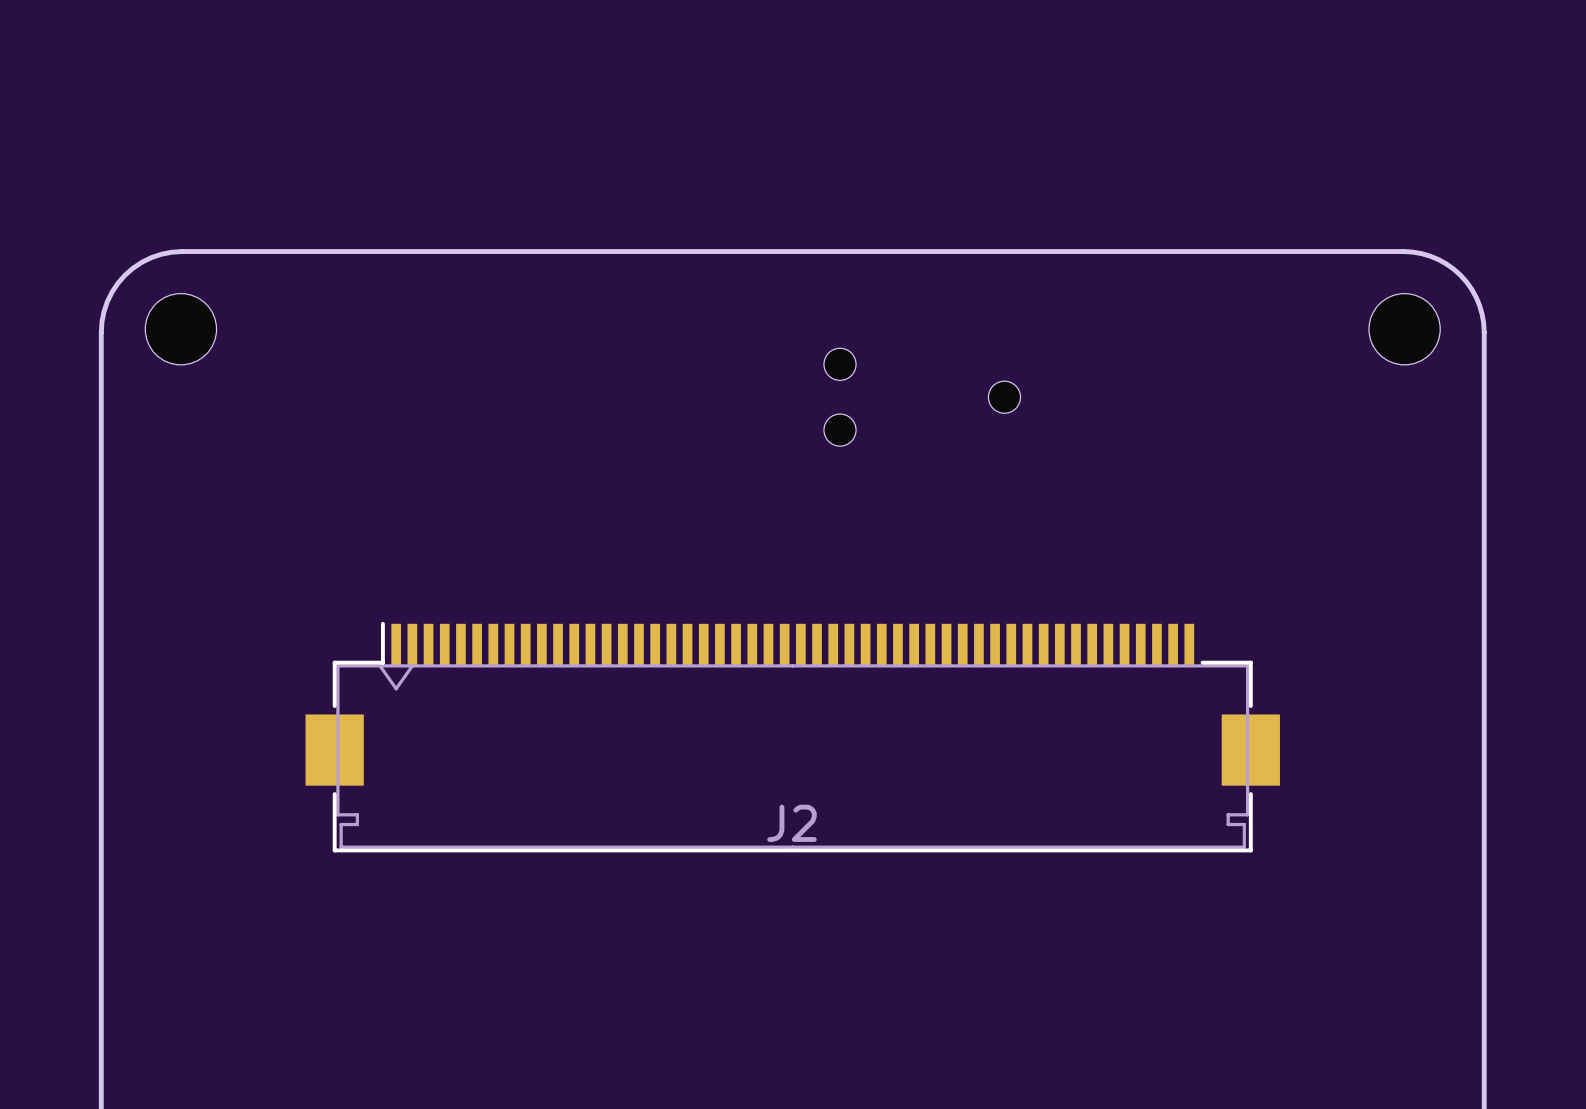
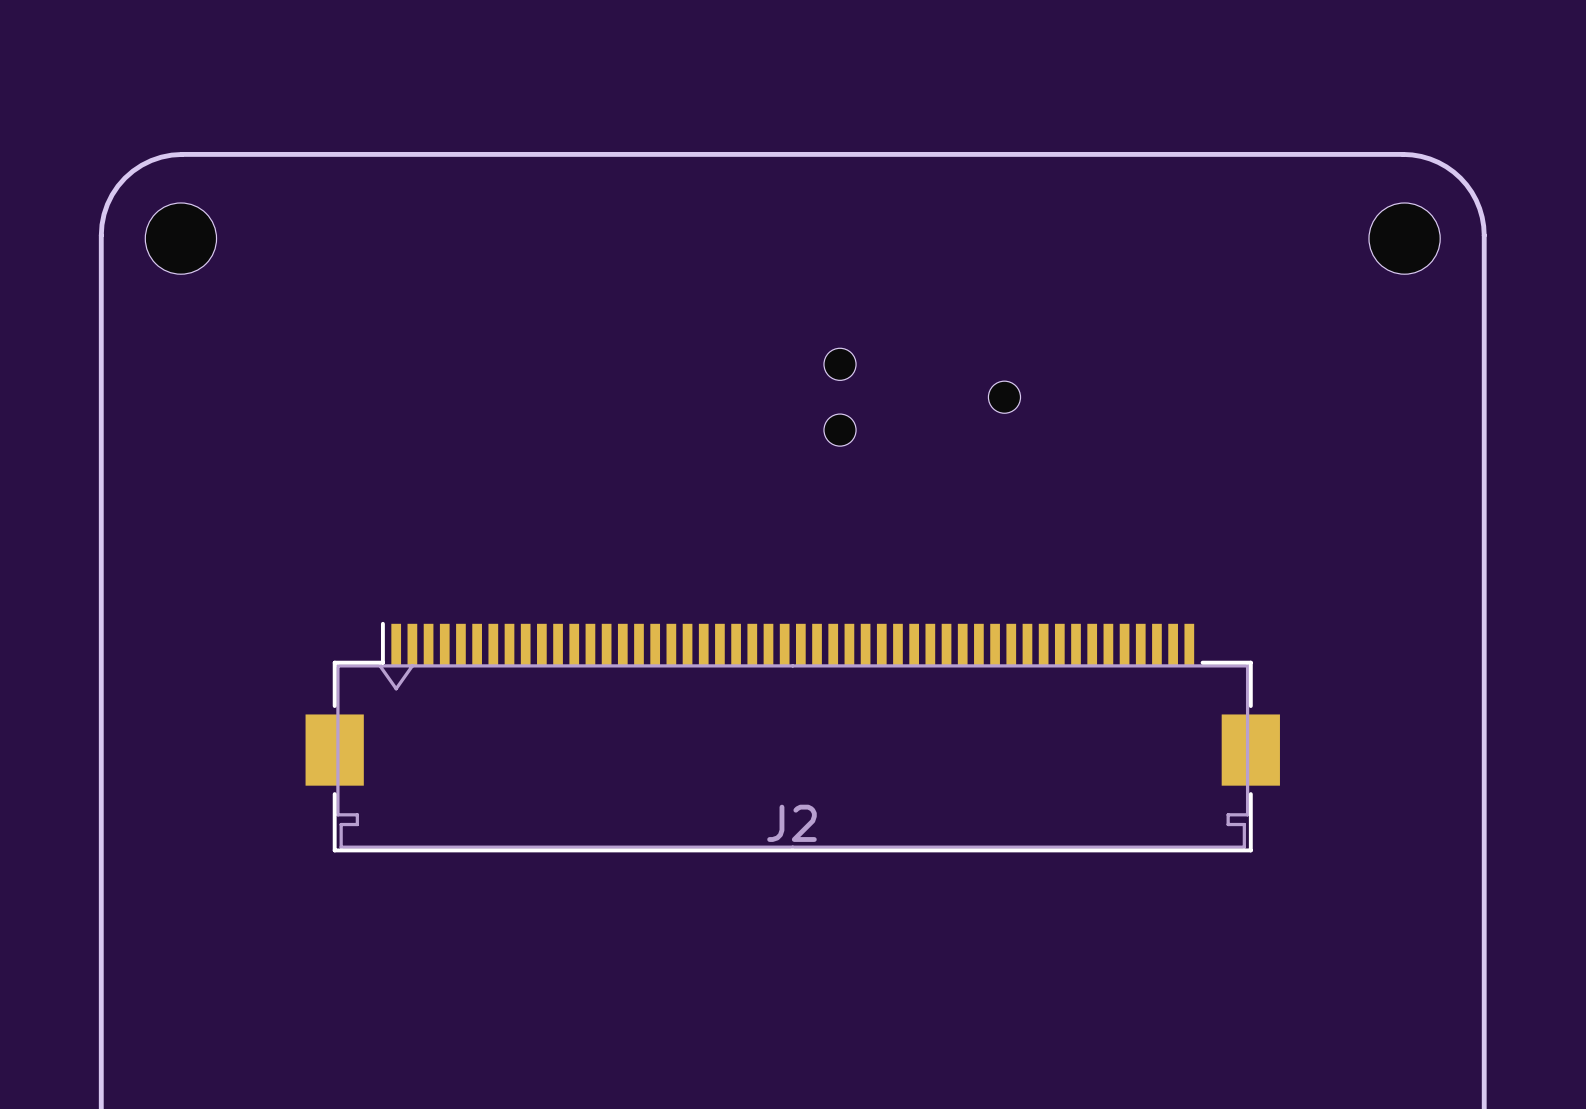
part position: (180, 329) -> (180, 238)
part position: (1404, 329) -> (1404, 238)
board edge: (1484, 332) (1482, 314) (1476, 297) (1460, 275) (1438, 259) (1421, 253) (1403, 251) (182, 251) (151, 257) (124, 275) (107, 301) (101, 332) -> (1484, 332) (1483, 226) (1476, 200) (1460, 178) (1446, 166) (1421, 156) (1403, 154) (171, 155) (151, 160) (132, 171) (118, 186) (107, 204) (101, 235) (101, 332)

